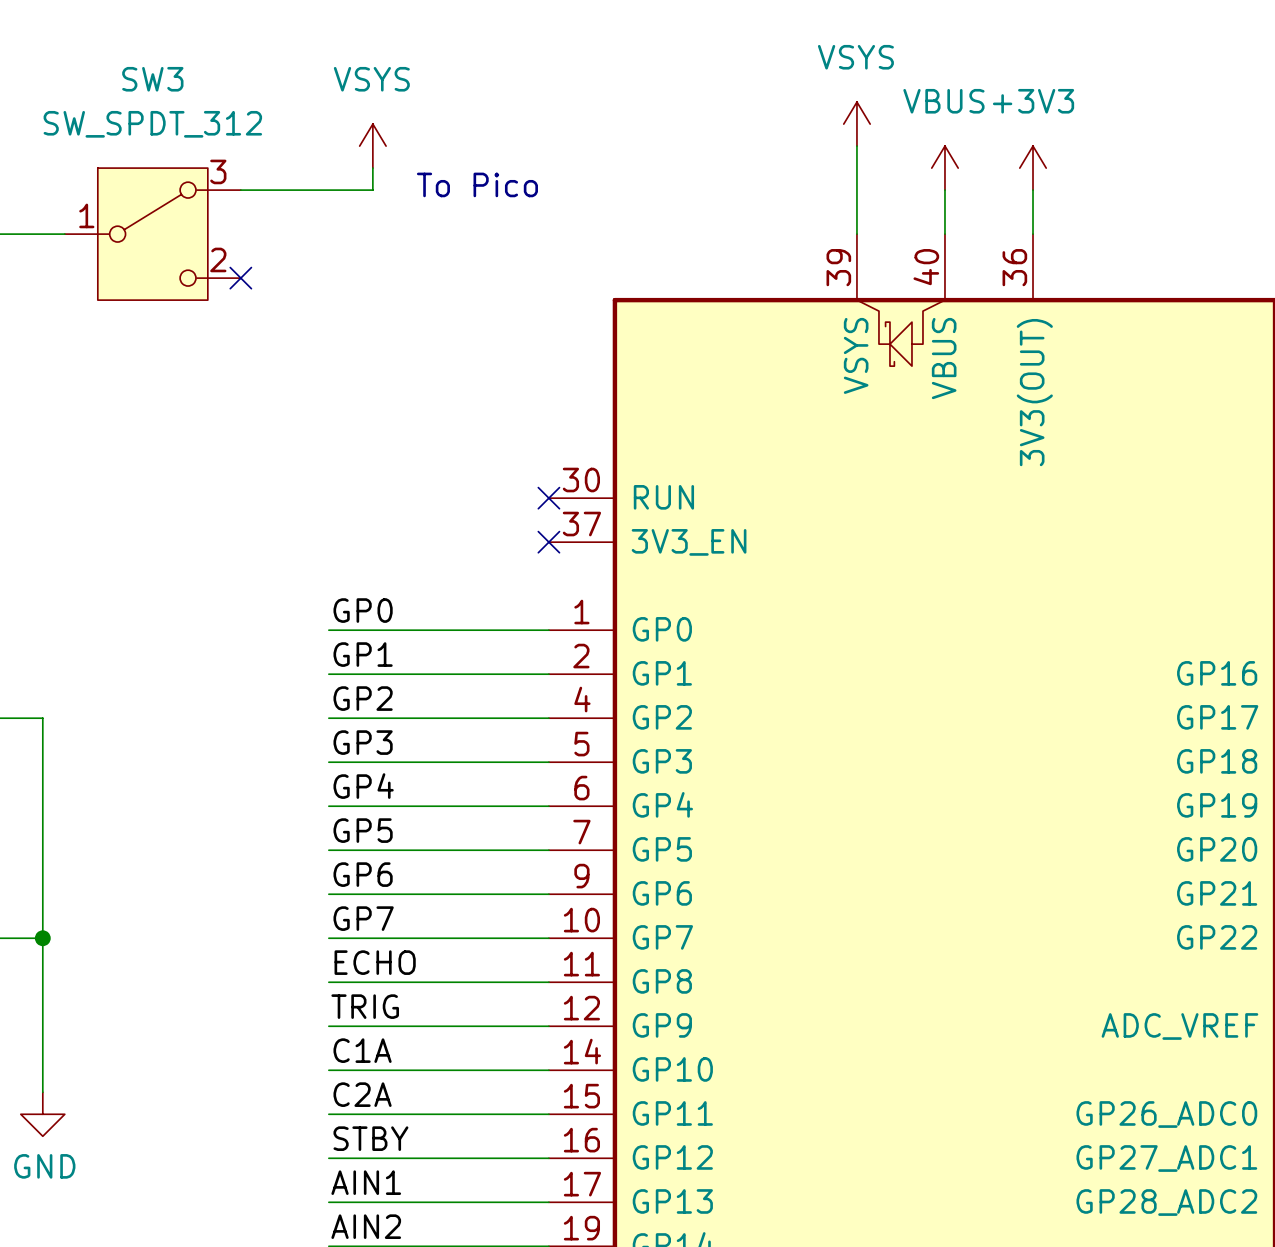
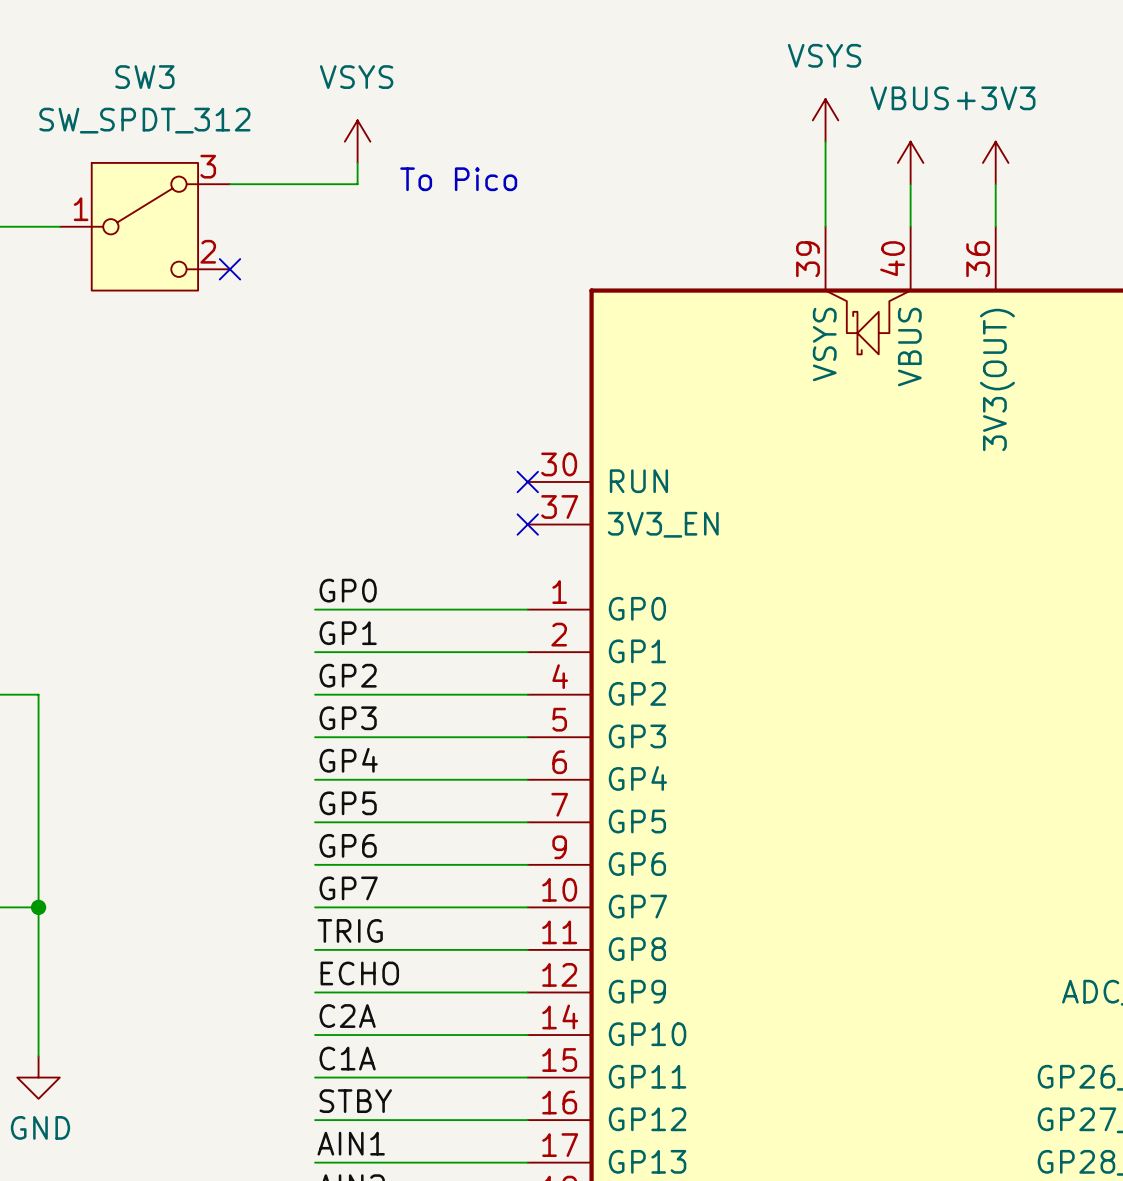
label: ECHO (375, 962) -> TRIG (350, 930)
label: TRIG (365, 1006) -> ECHO (359, 973)
label: C1A (362, 1050) -> C2A (347, 1016)
label: C2A (362, 1094) -> C1A (347, 1058)

